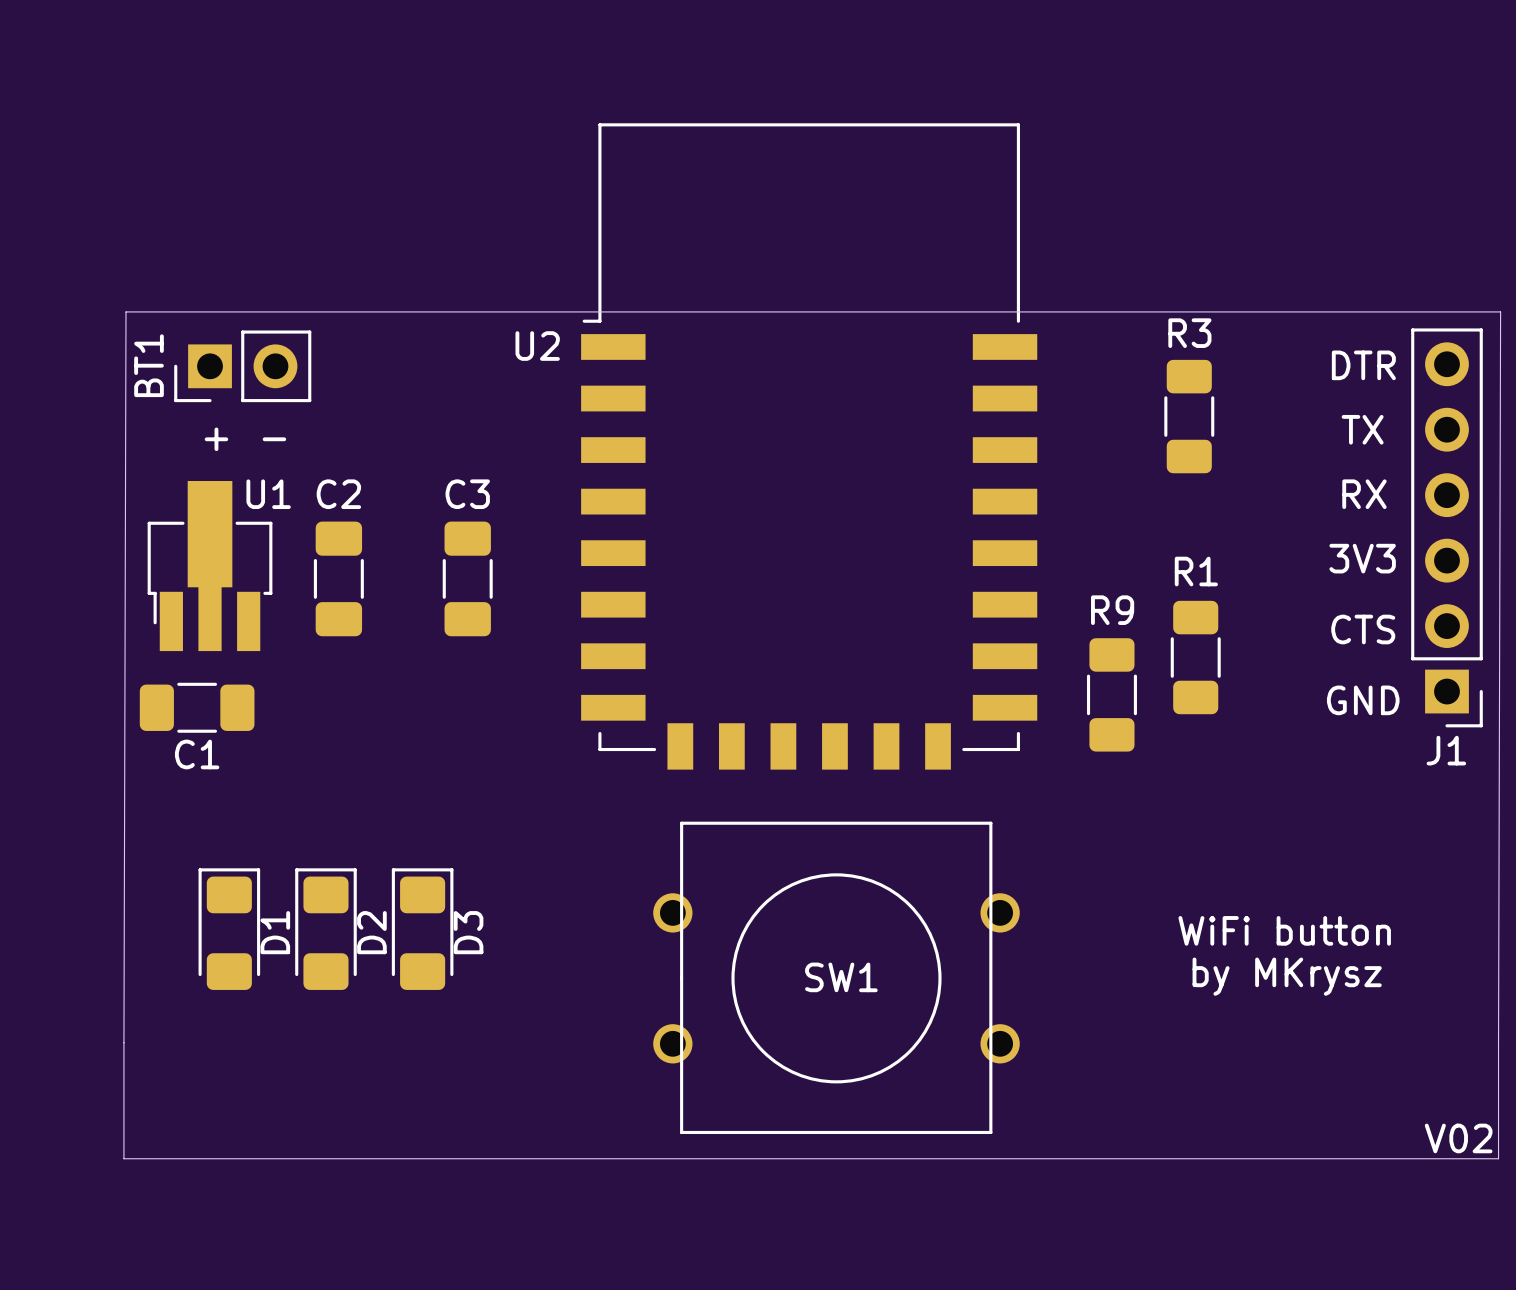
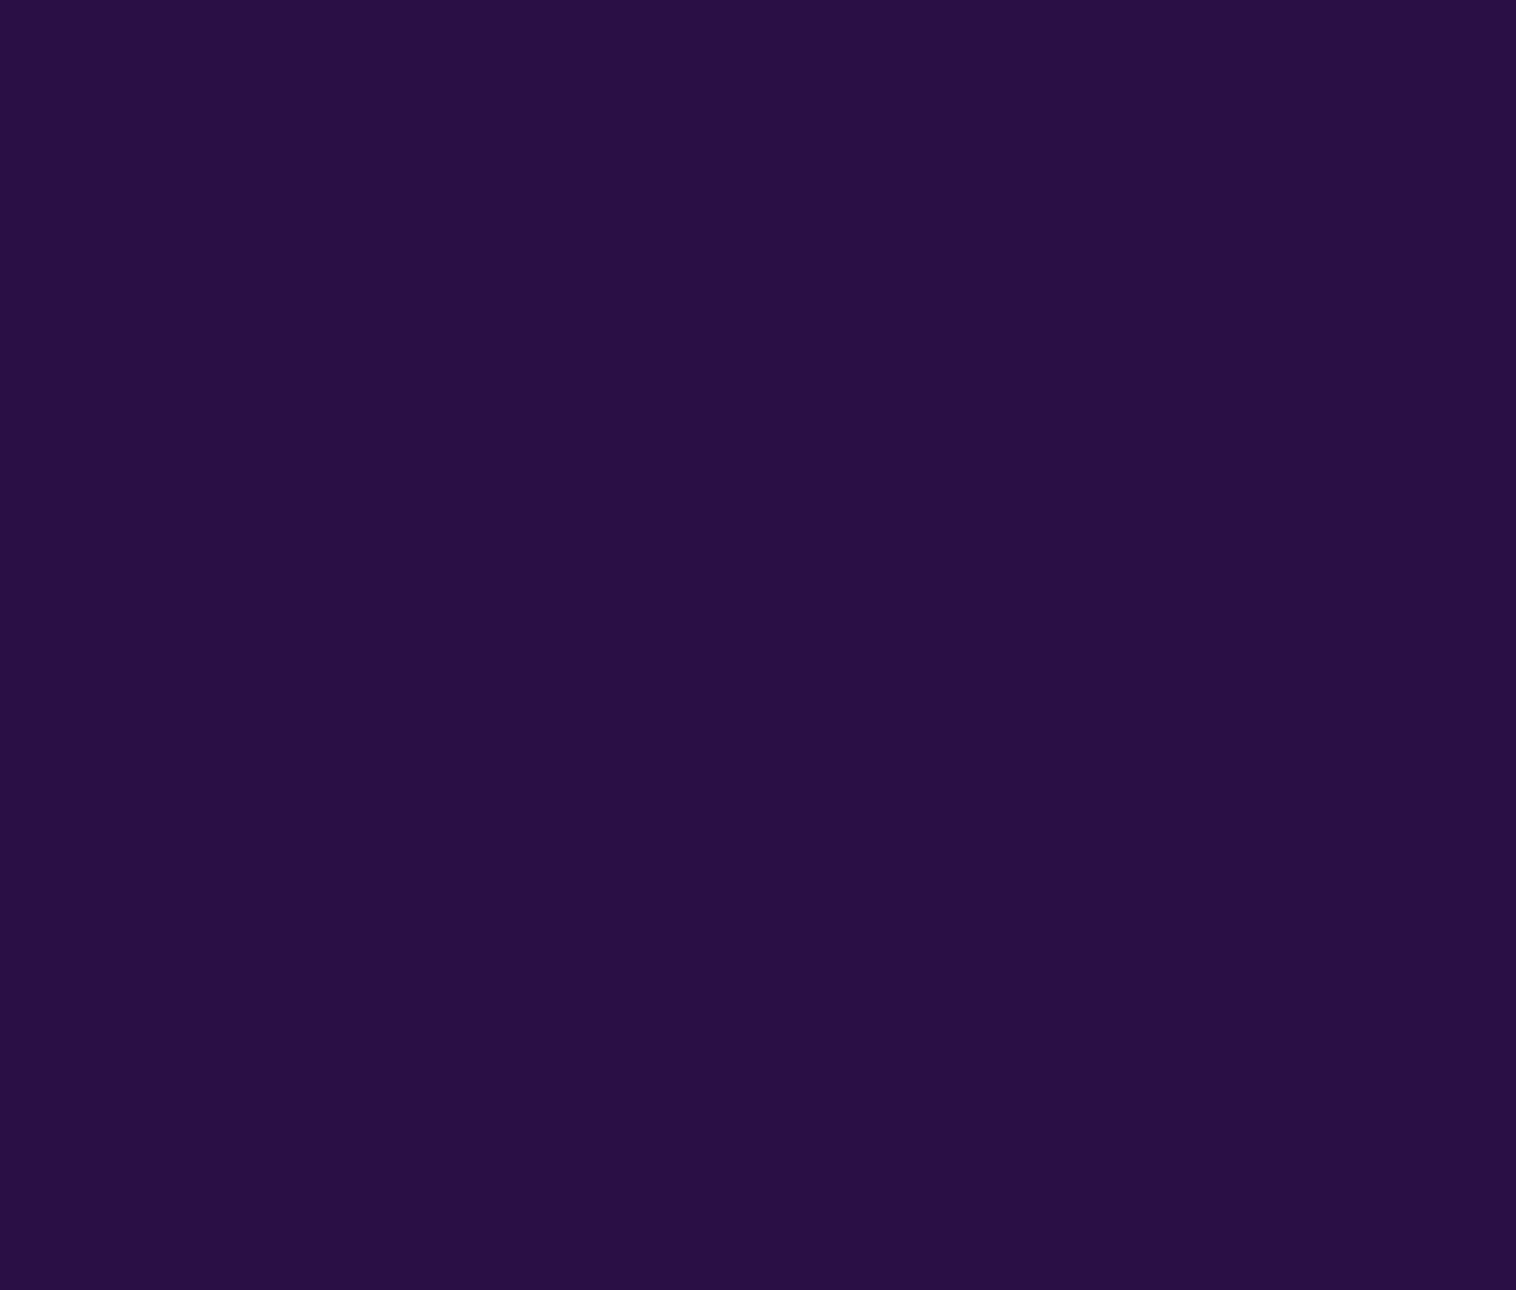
board edge: (126, 311) (123, 1158) (1498, 1158) (1500, 311) (126, 311) -> none
text: DTR (1363, 365) -> none
BT1: (242, 366) -> none
R3: (1189, 416) -> none
text: TX (1362, 429) -> none
text: + (216, 439) -> none
text: - (274, 439) -> none
U2: (809, 446) -> none
text: RX (1364, 494) -> none
J1: (1446, 527) -> none
text: 3V3 (1362, 558) -> none
U1: (210, 566) -> none
C2: (338, 578) -> none
C3: (467, 578) -> none
text: CTS (1363, 629) -> none
R1: (1195, 657) -> none
R9: (1111, 694) -> none
text: GND (1363, 700) -> none
C1: (197, 707) -> none
D1: (229, 929) -> none
D2: (325, 929) -> none
D3: (422, 929) -> none
text: WiFi button (1284, 930) -> none
text: by MKrysz (1287, 976) -> none
SW1: (836, 977) -> none
text: V02 (1458, 1138) -> none

